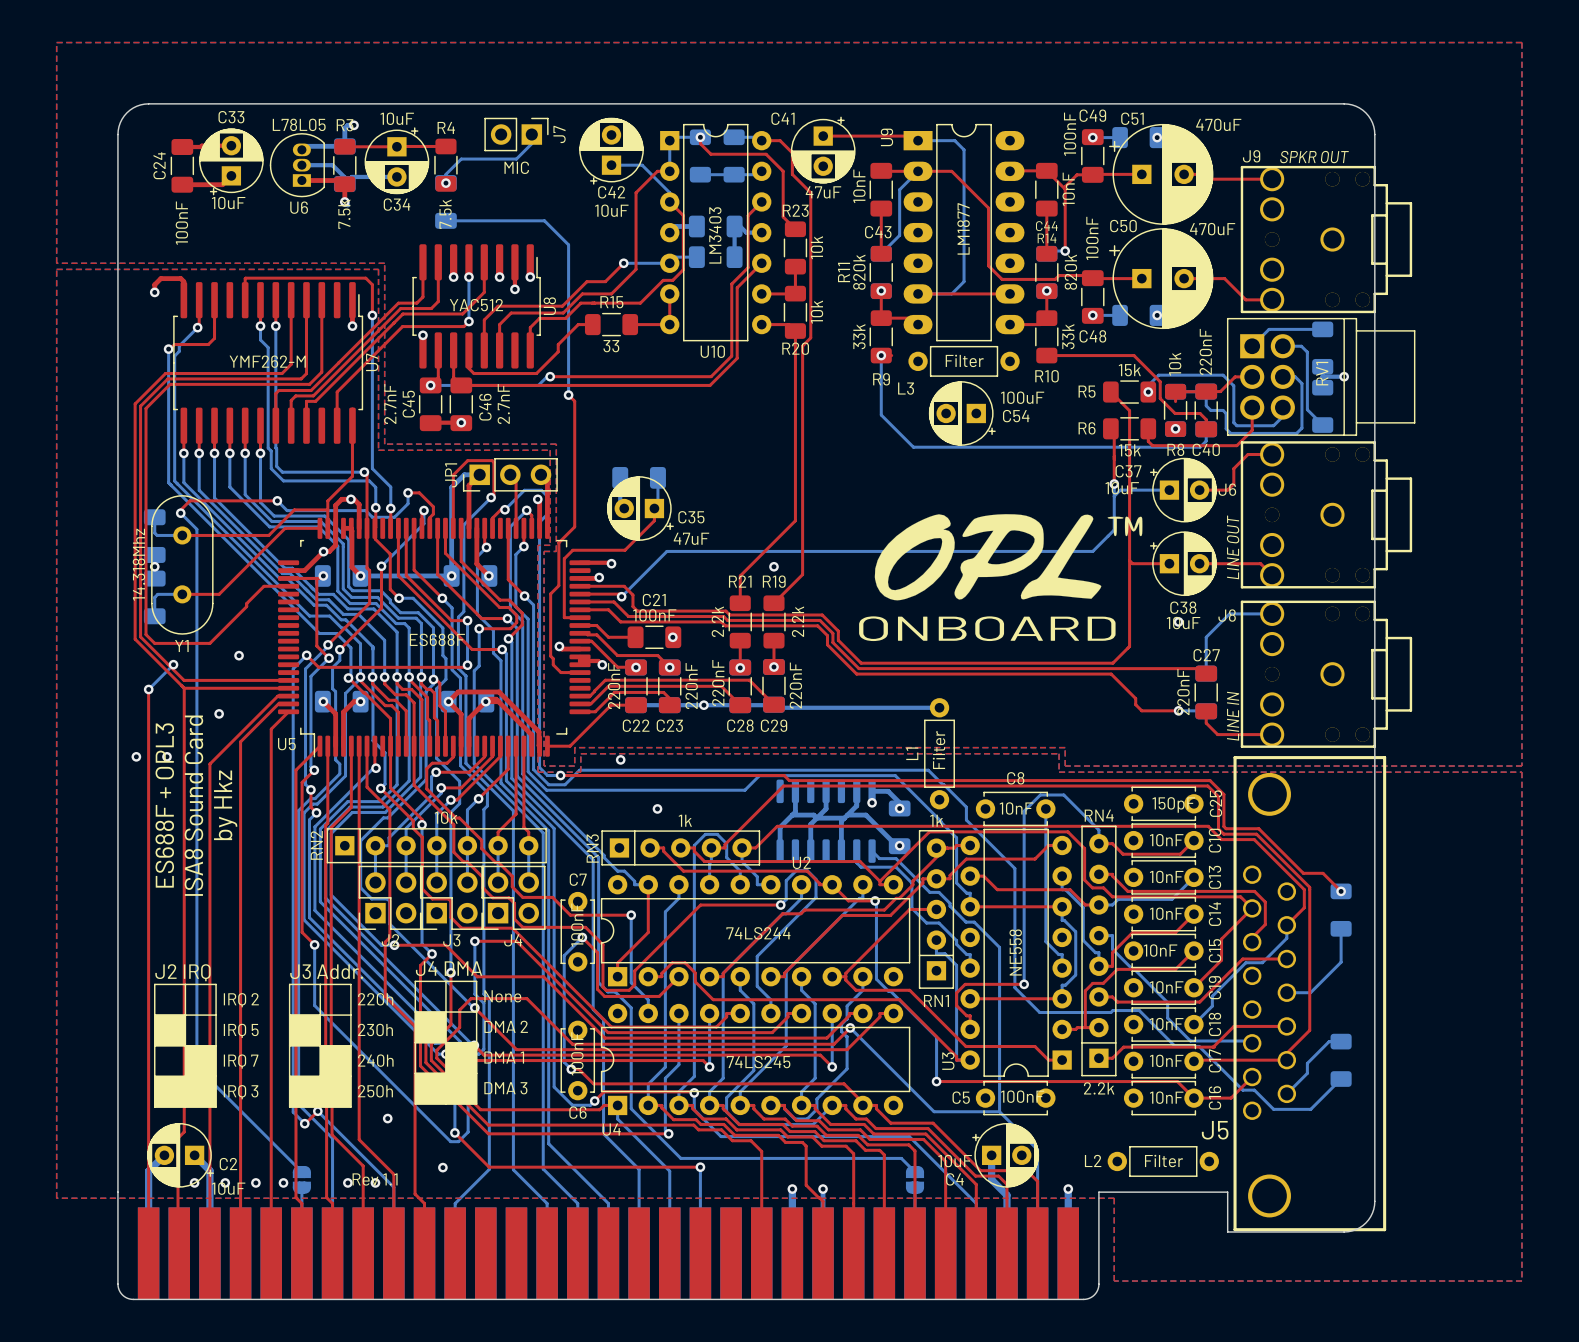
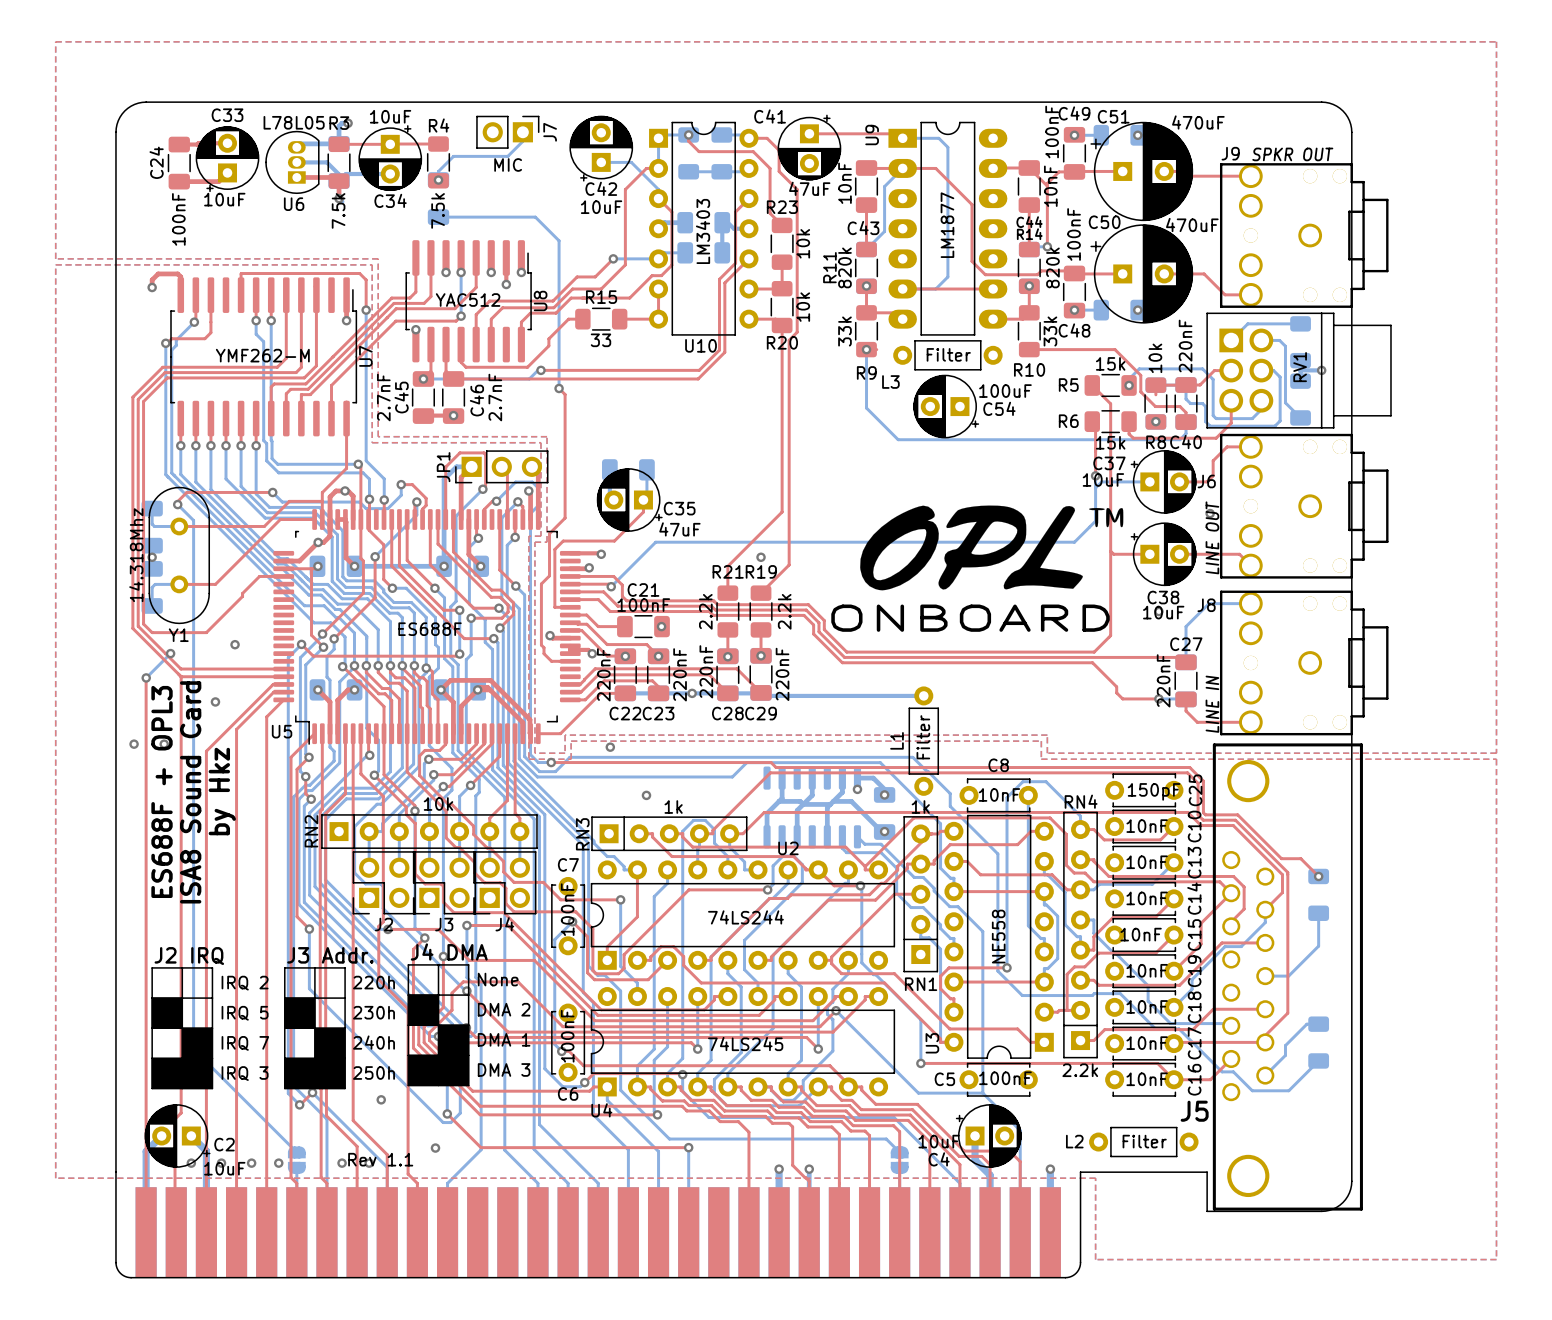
via: none -> (1210, 513)

